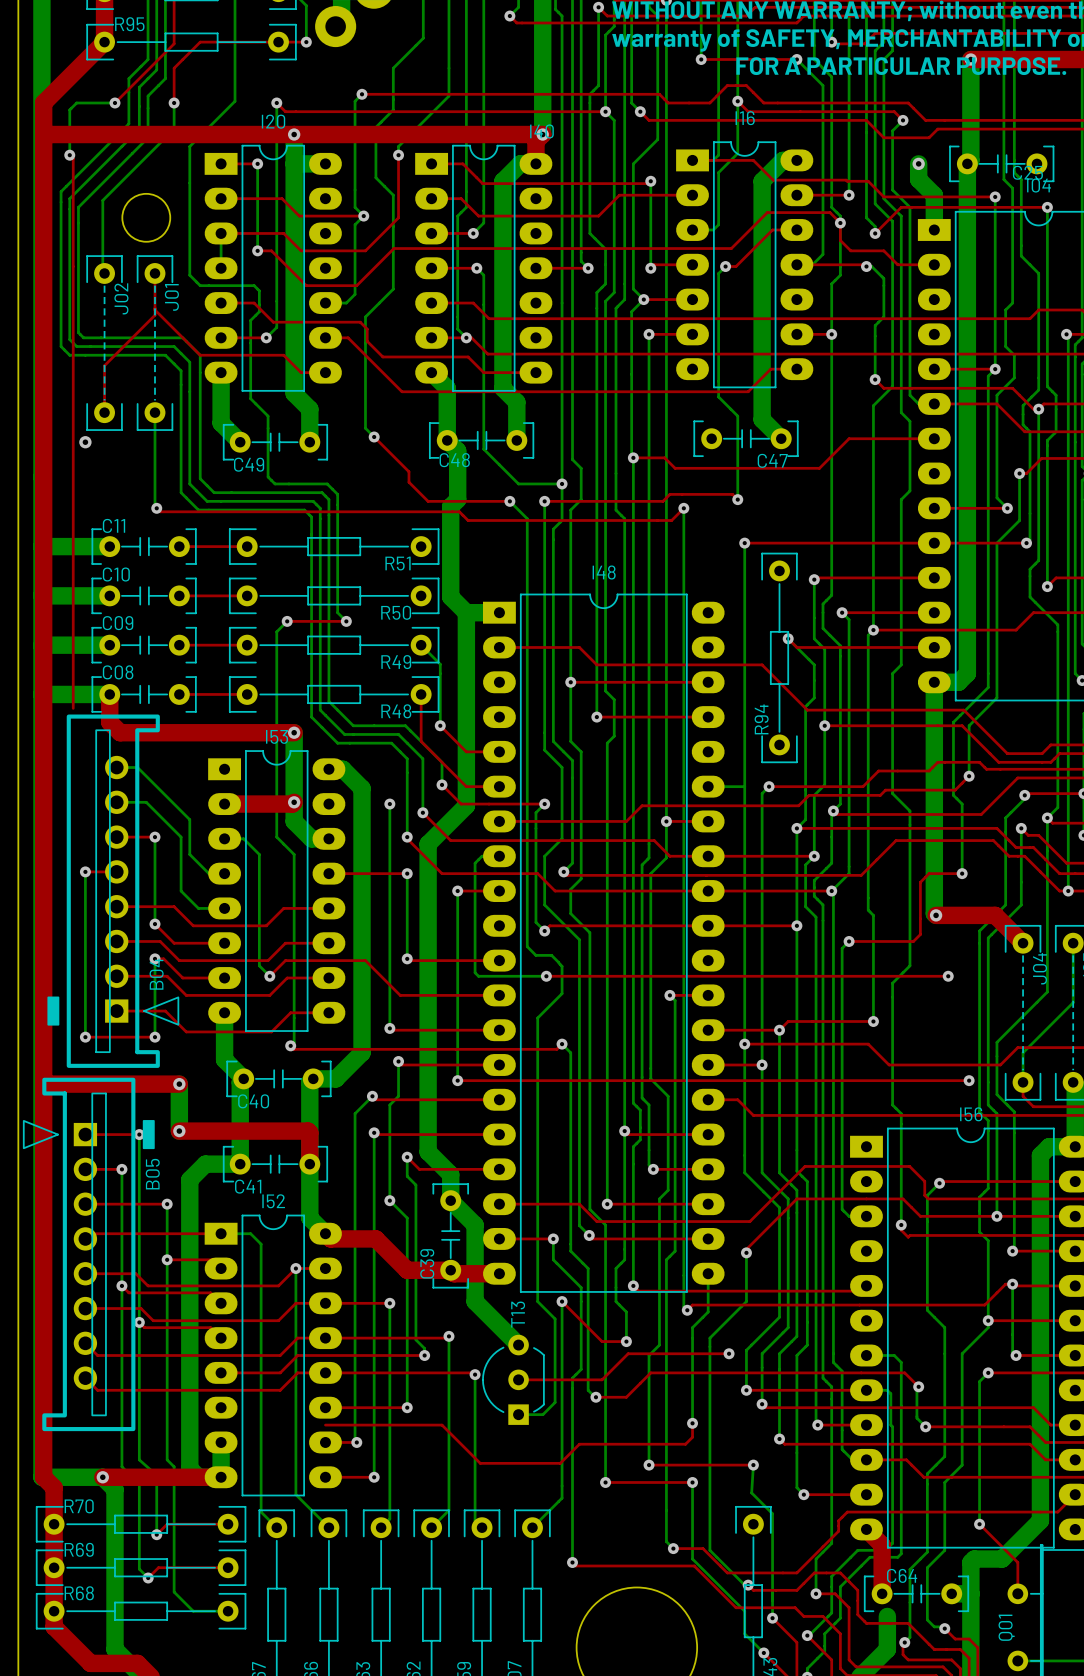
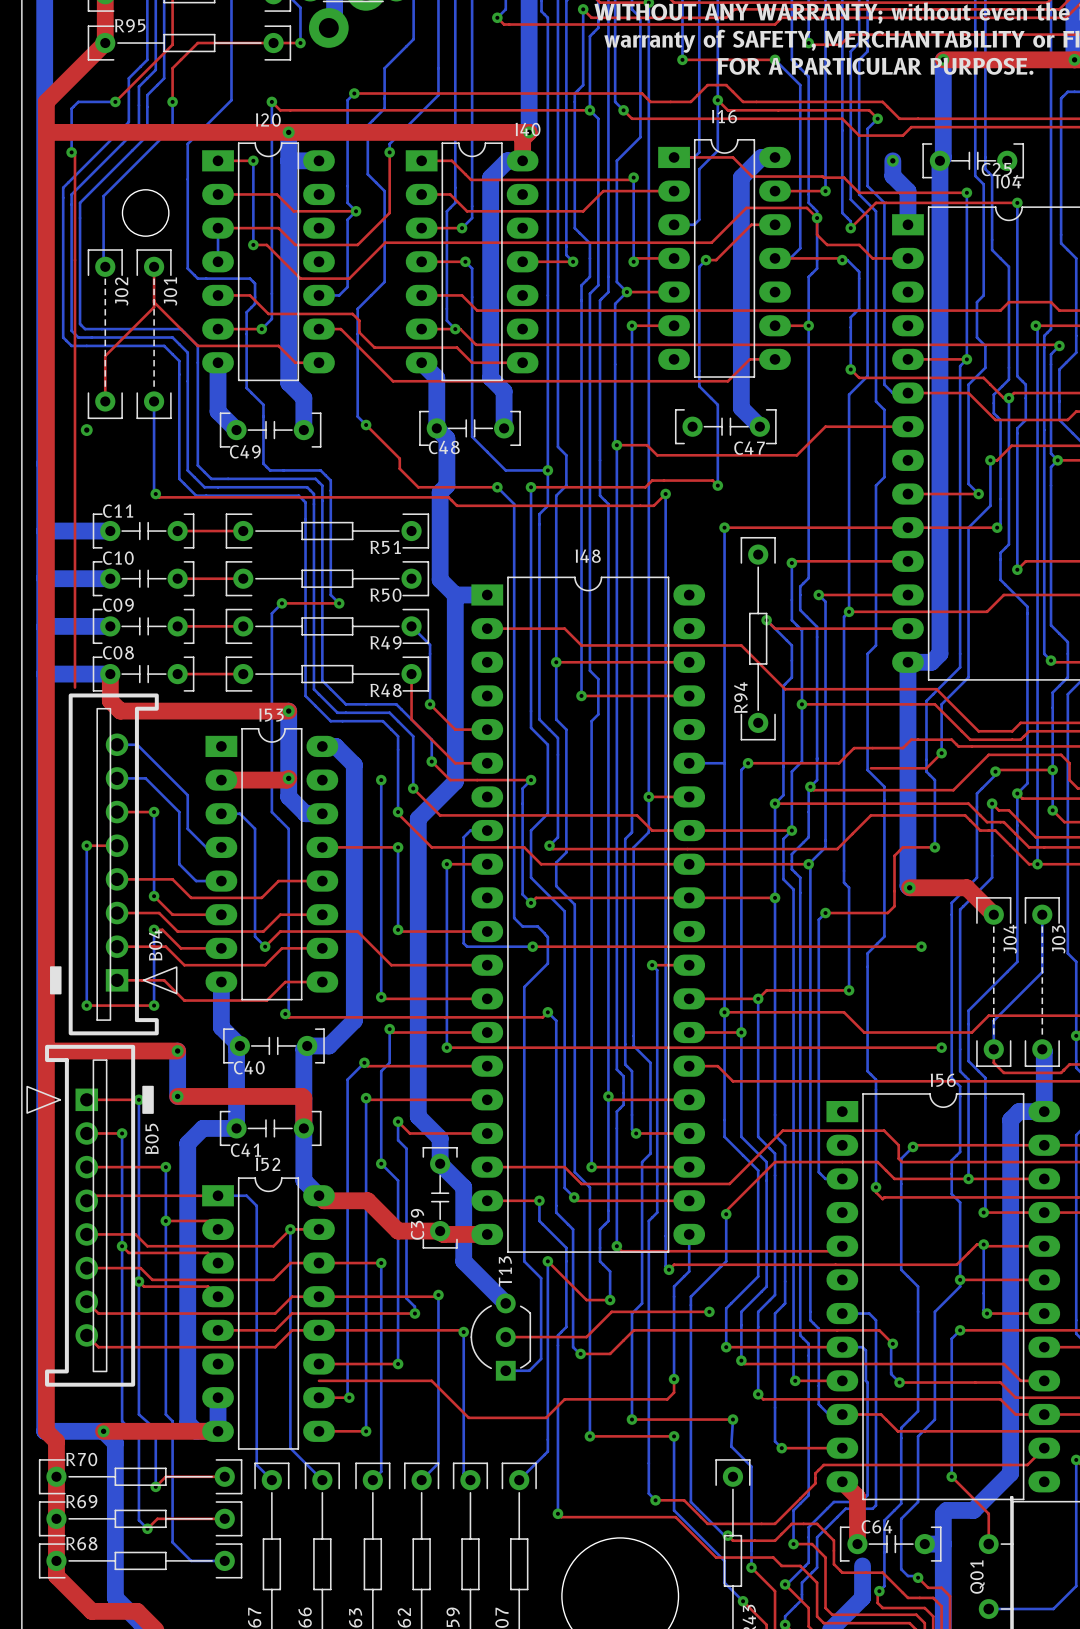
top track: (955, 790) (885, 790) (880, 795) (809, 795) (798, 805) (642, 805) (626, 821) (499, 821) -> (928, 766) (926, 768) (870, 768)

